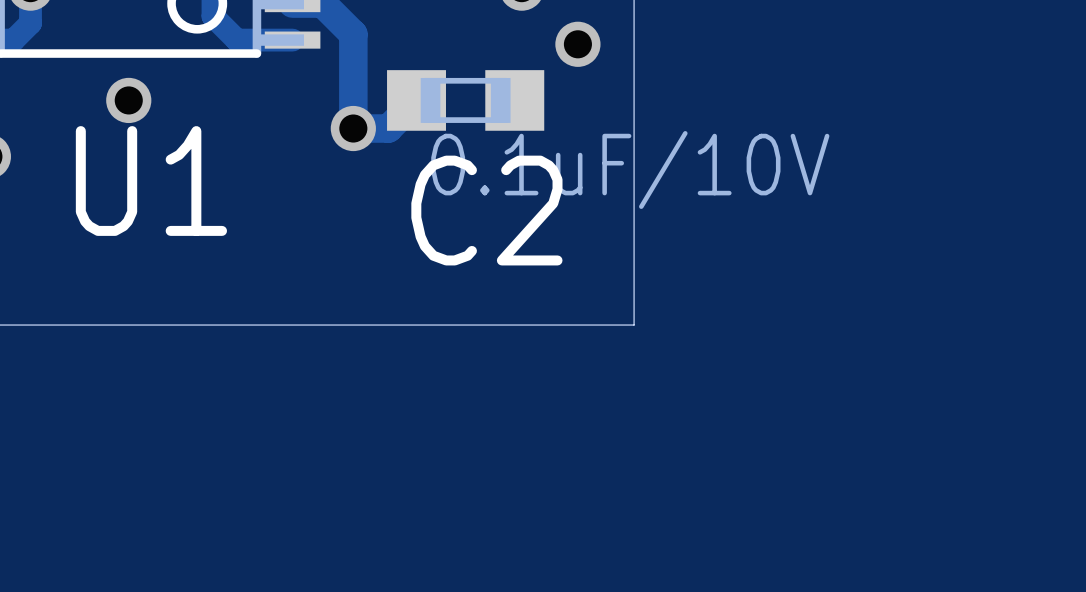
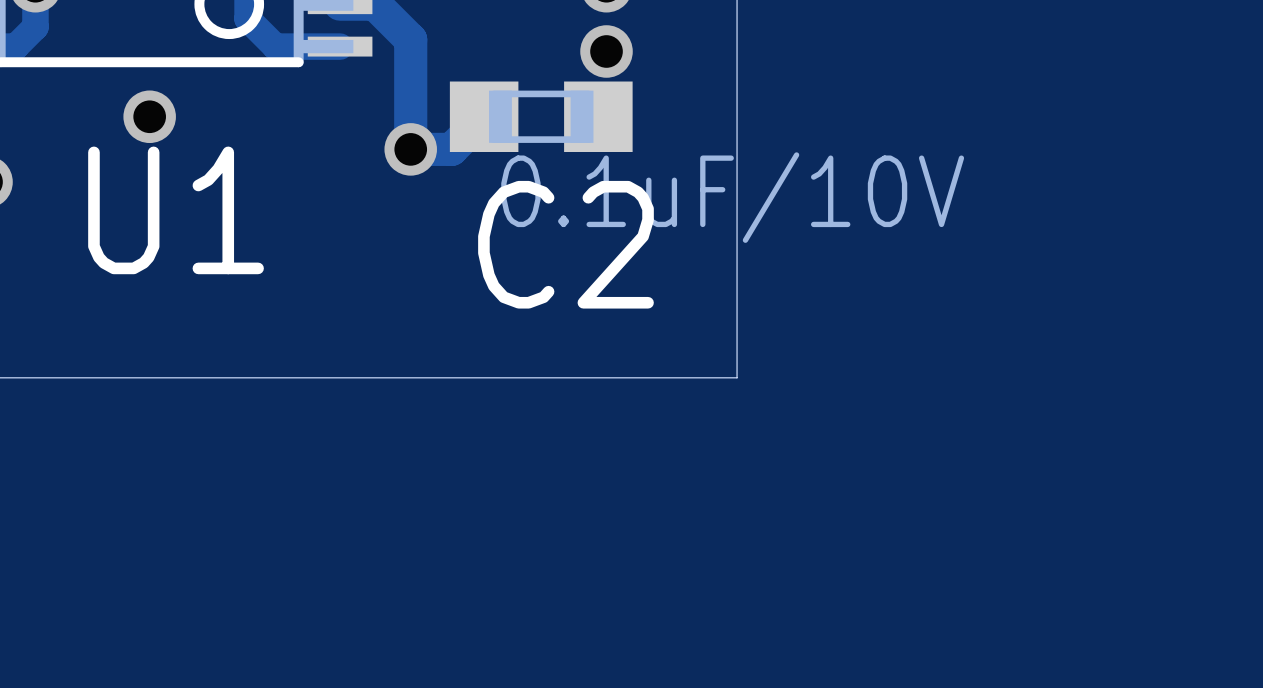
via: none -> (606, 51)
via: (577, 44) -> none

